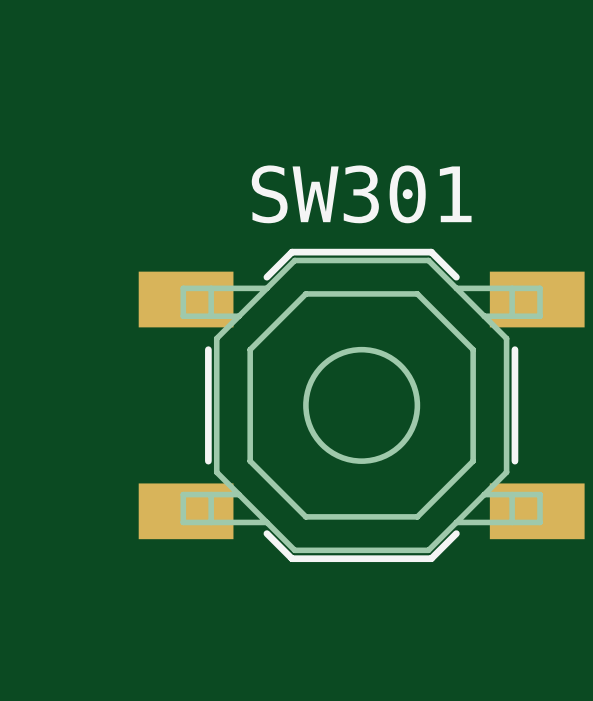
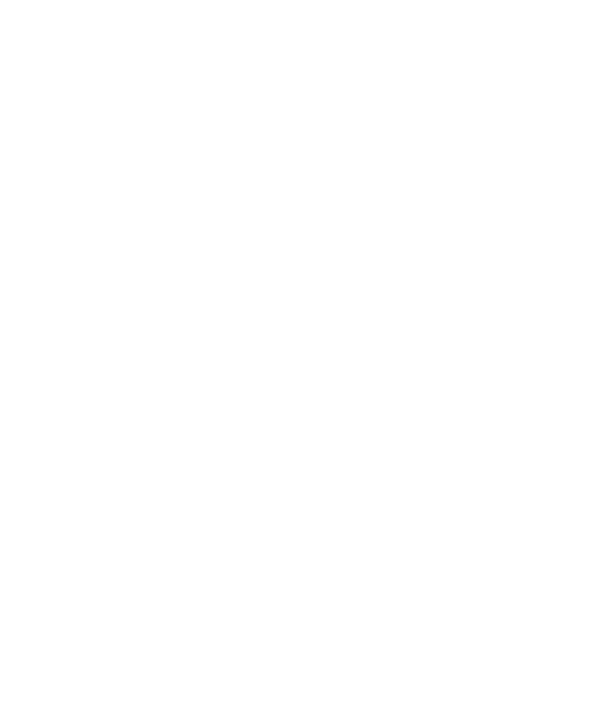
SW301: (361, 405) -> none

